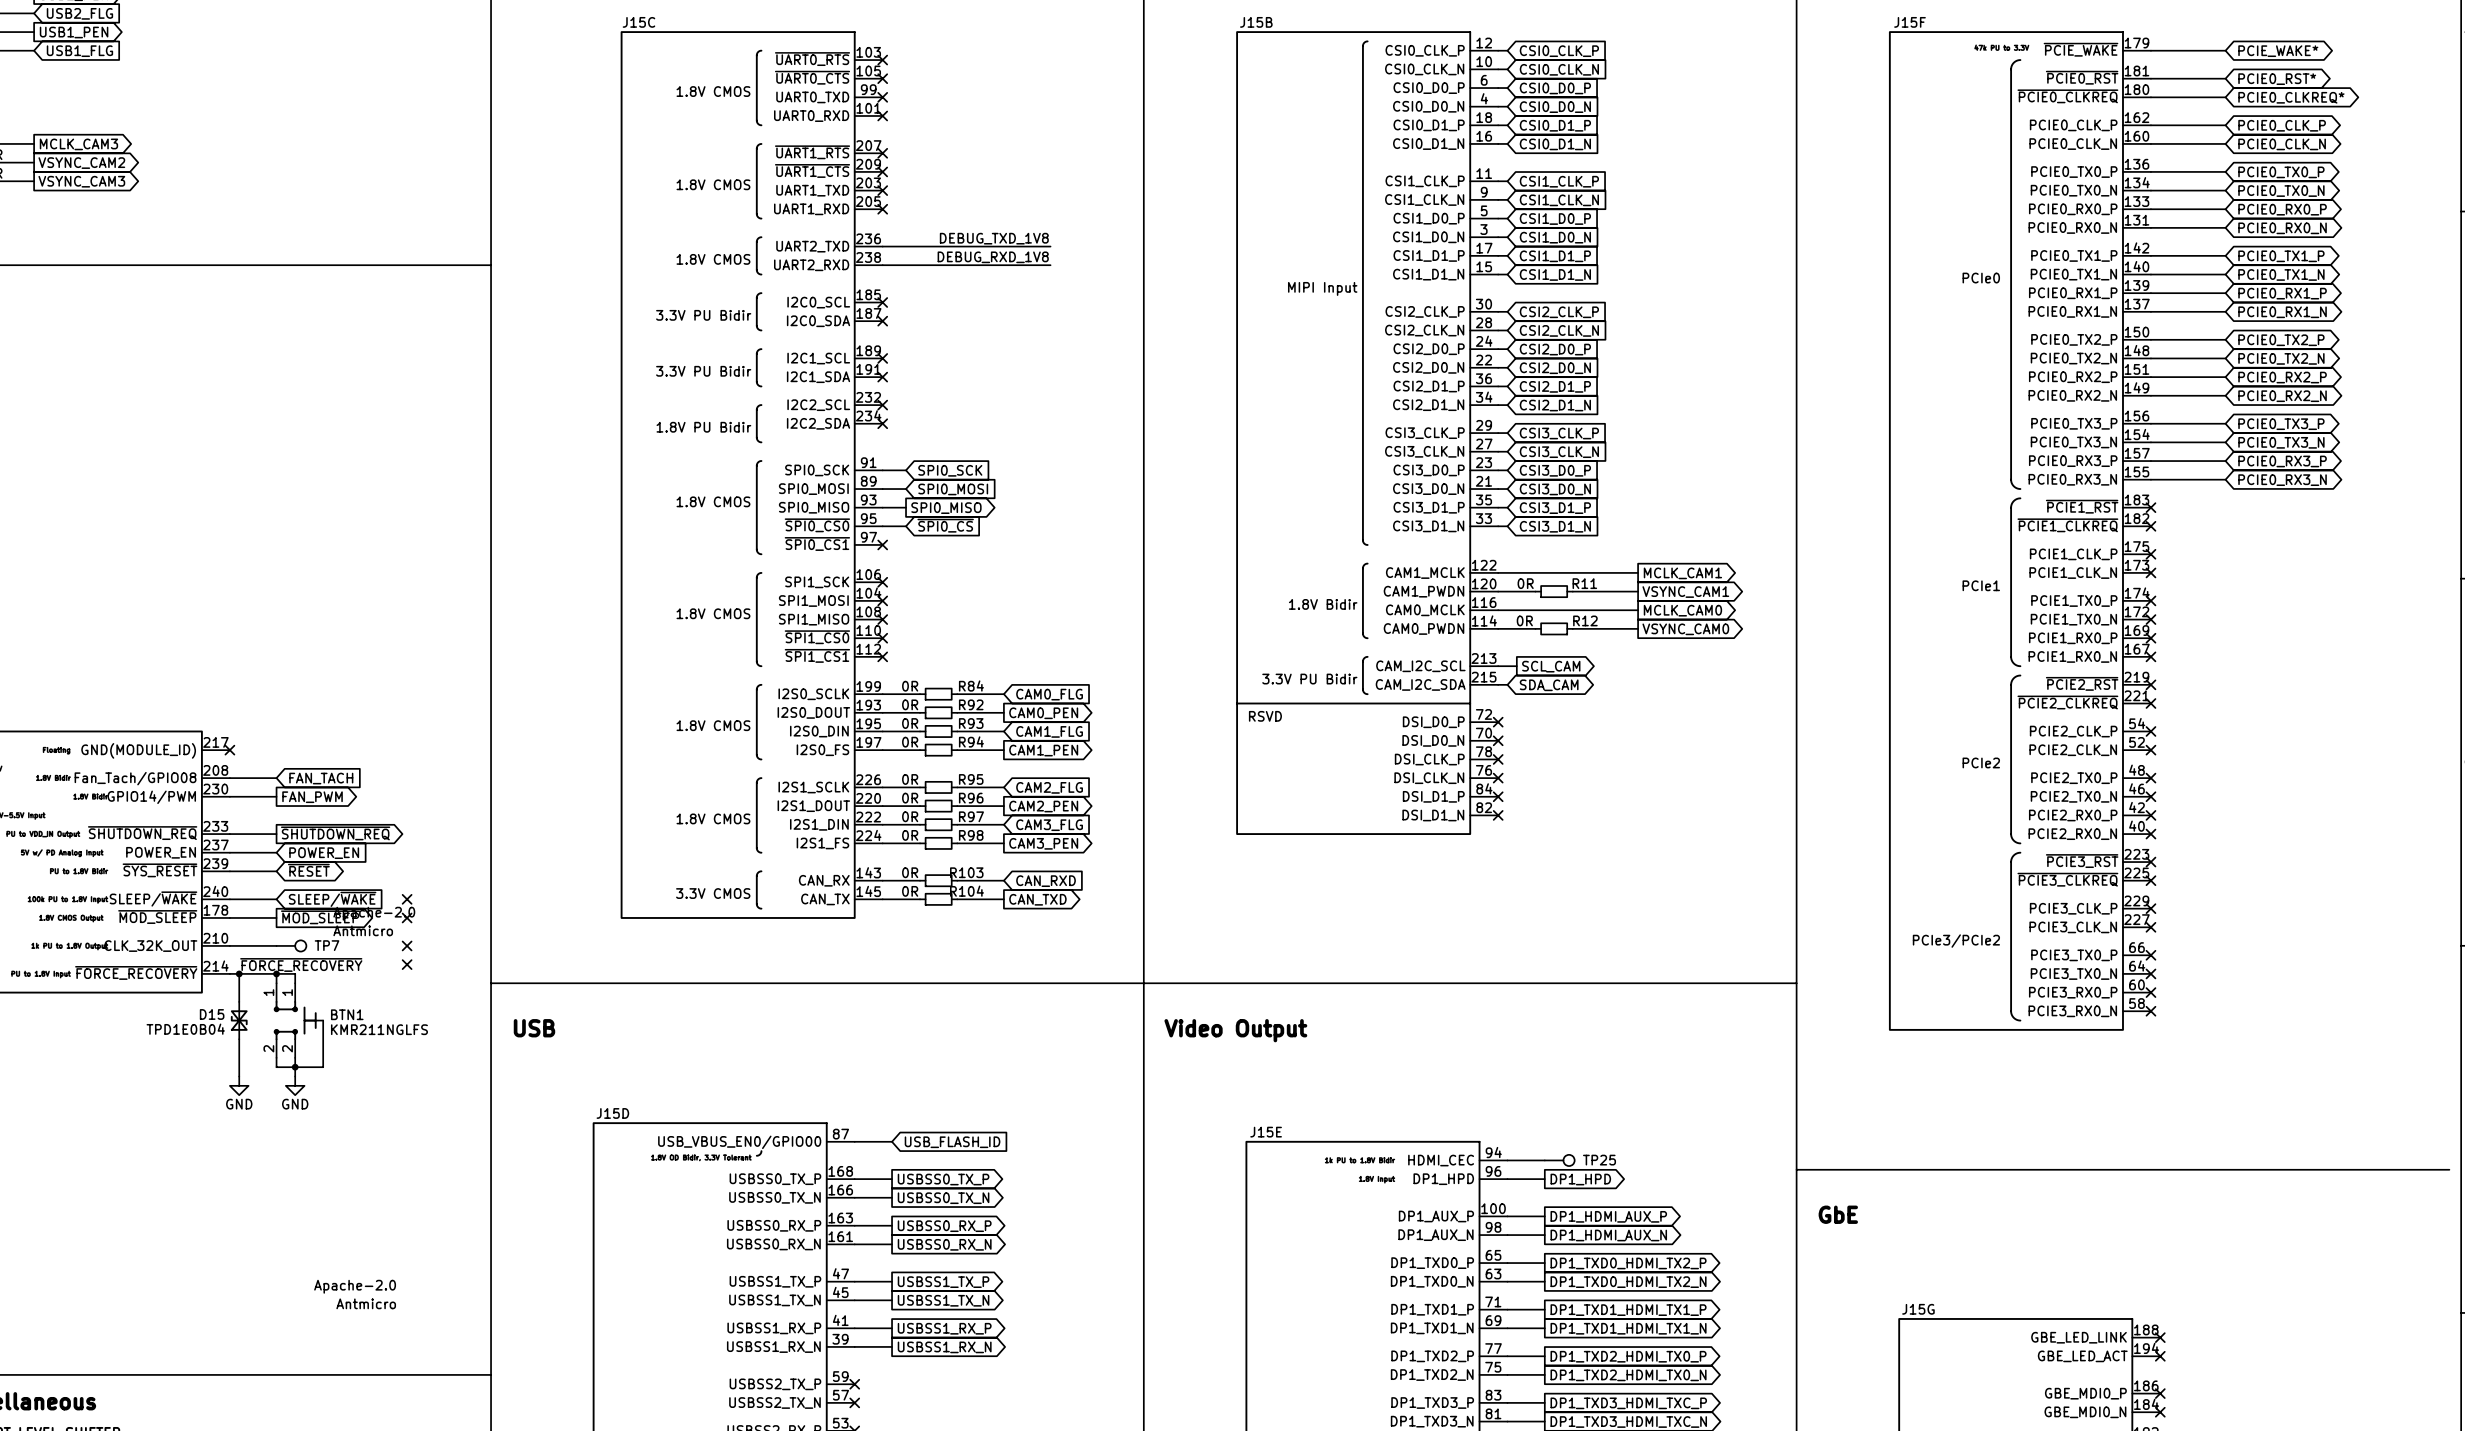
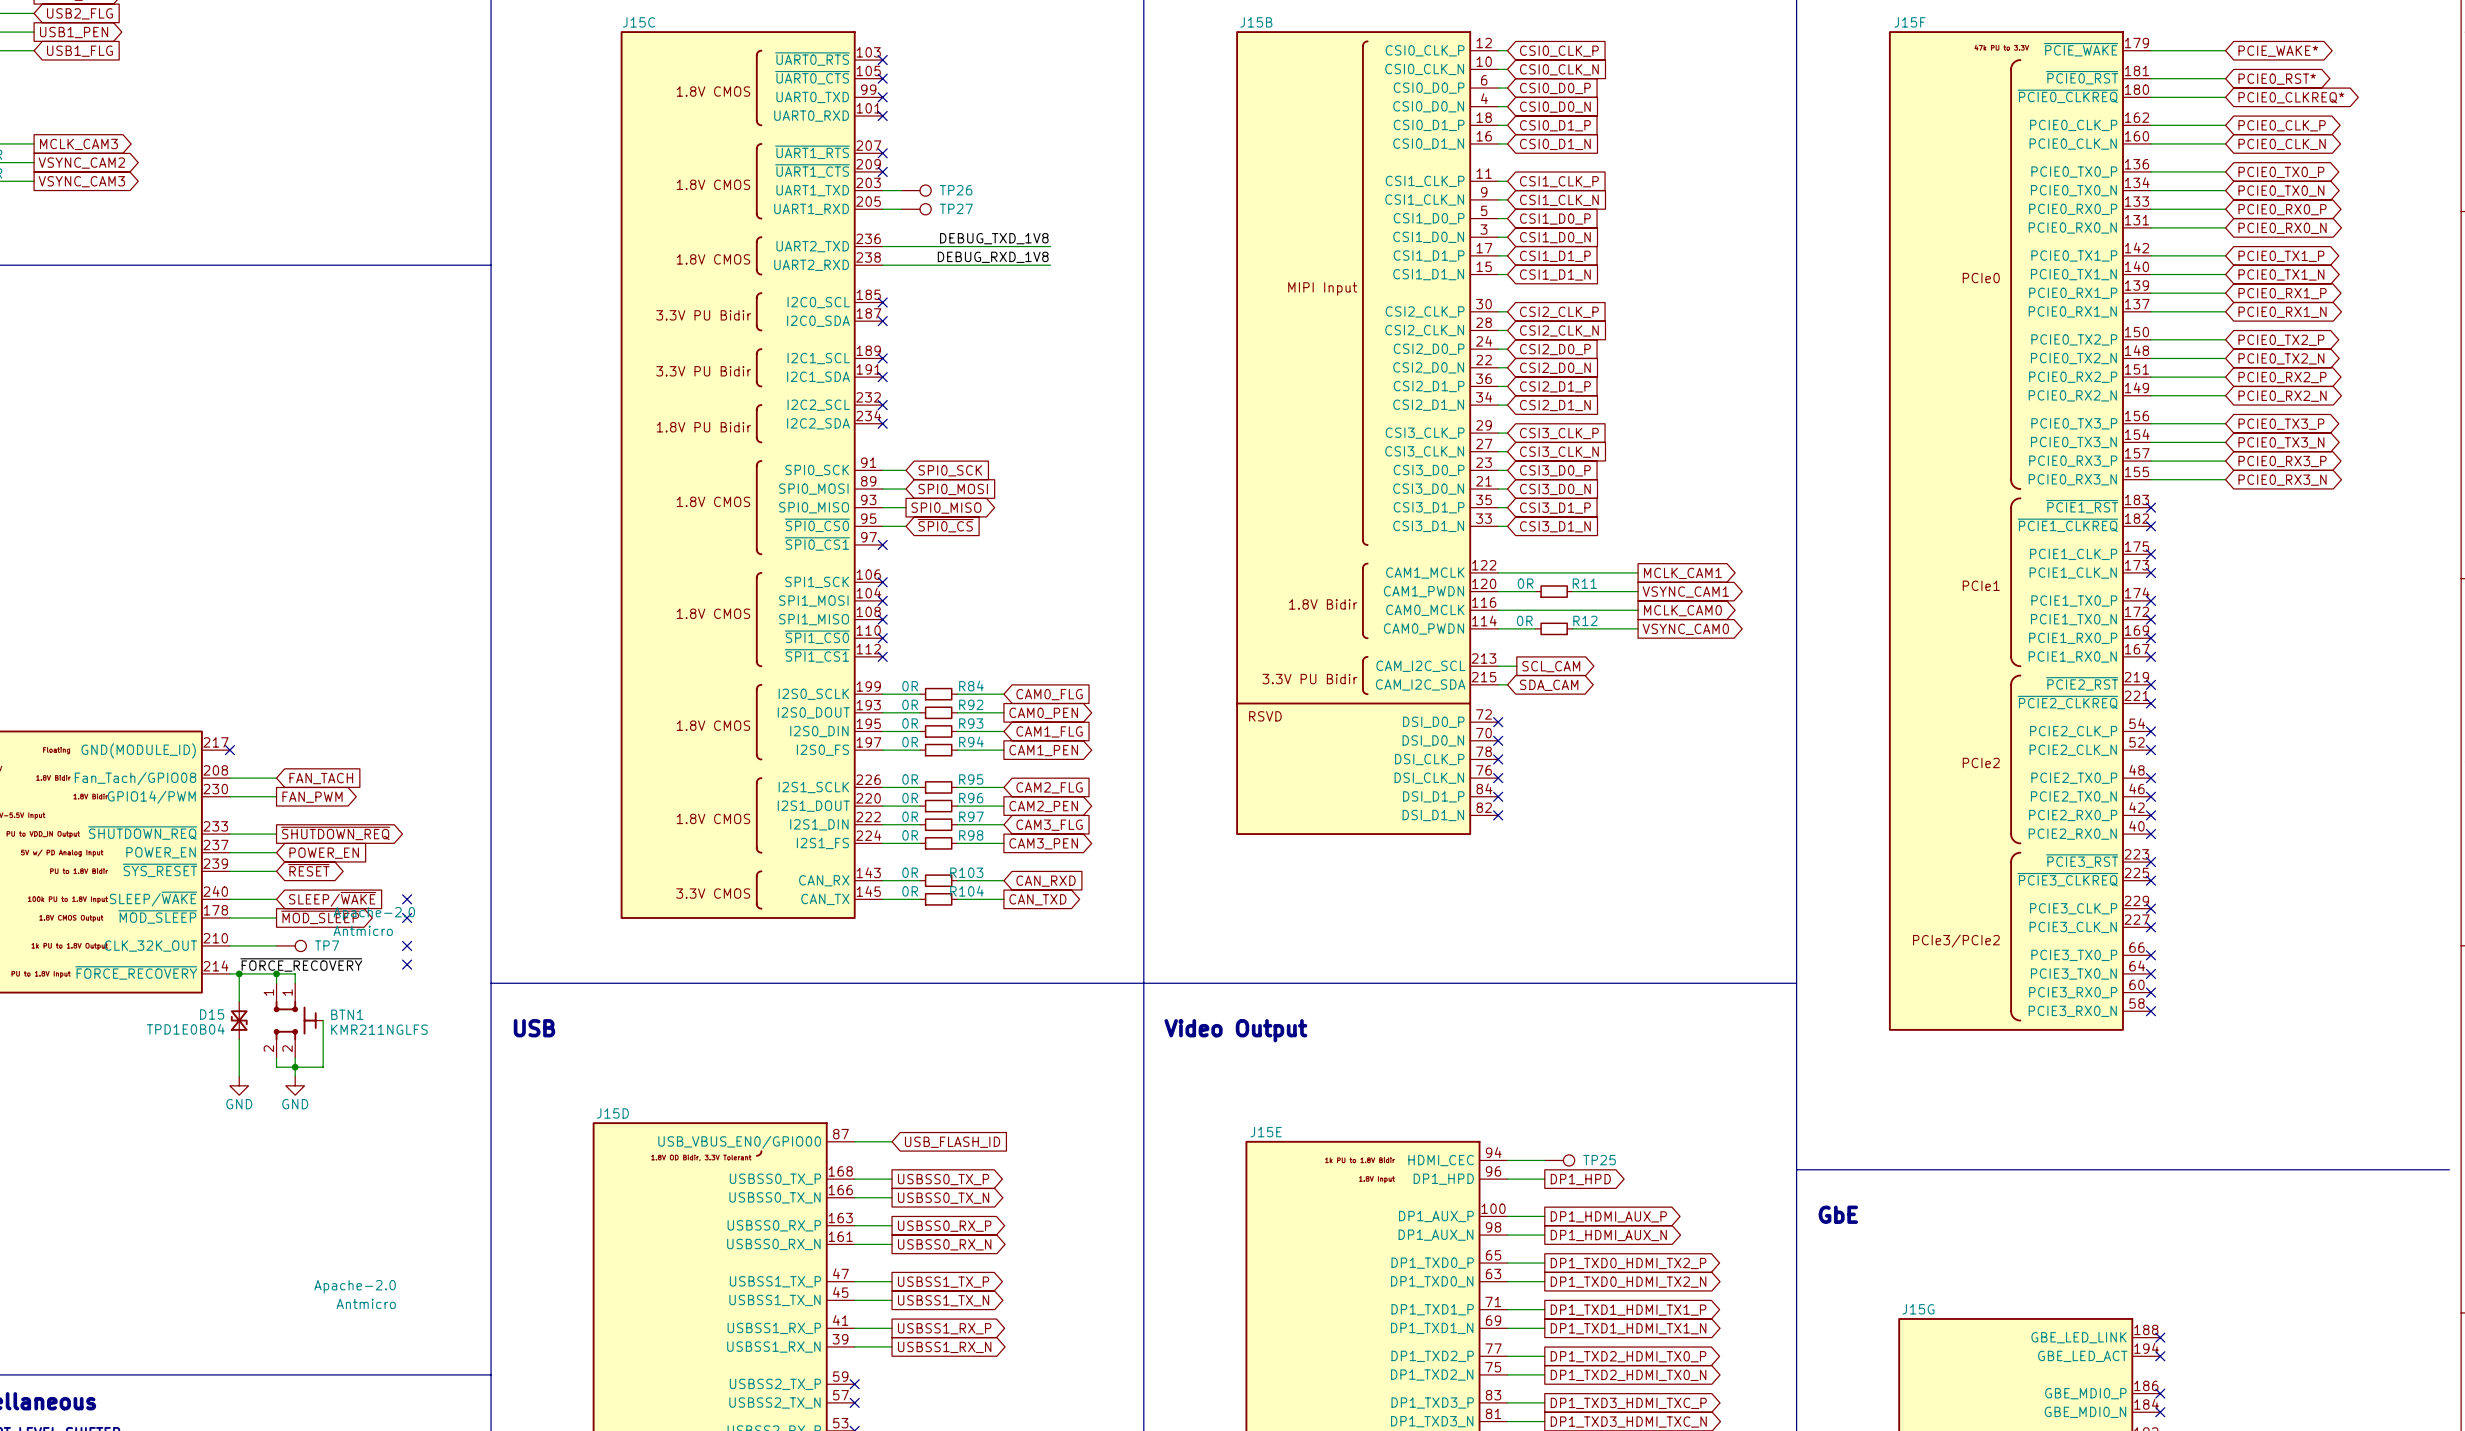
wire: none -> (882, 190) (901, 190)
no-connect mark: (882, 190) -> none
TP26: none -> (916, 190)
wire: none -> (882, 209) (901, 209)
no-connect mark: (882, 209) -> none
TP27: none -> (916, 209)

